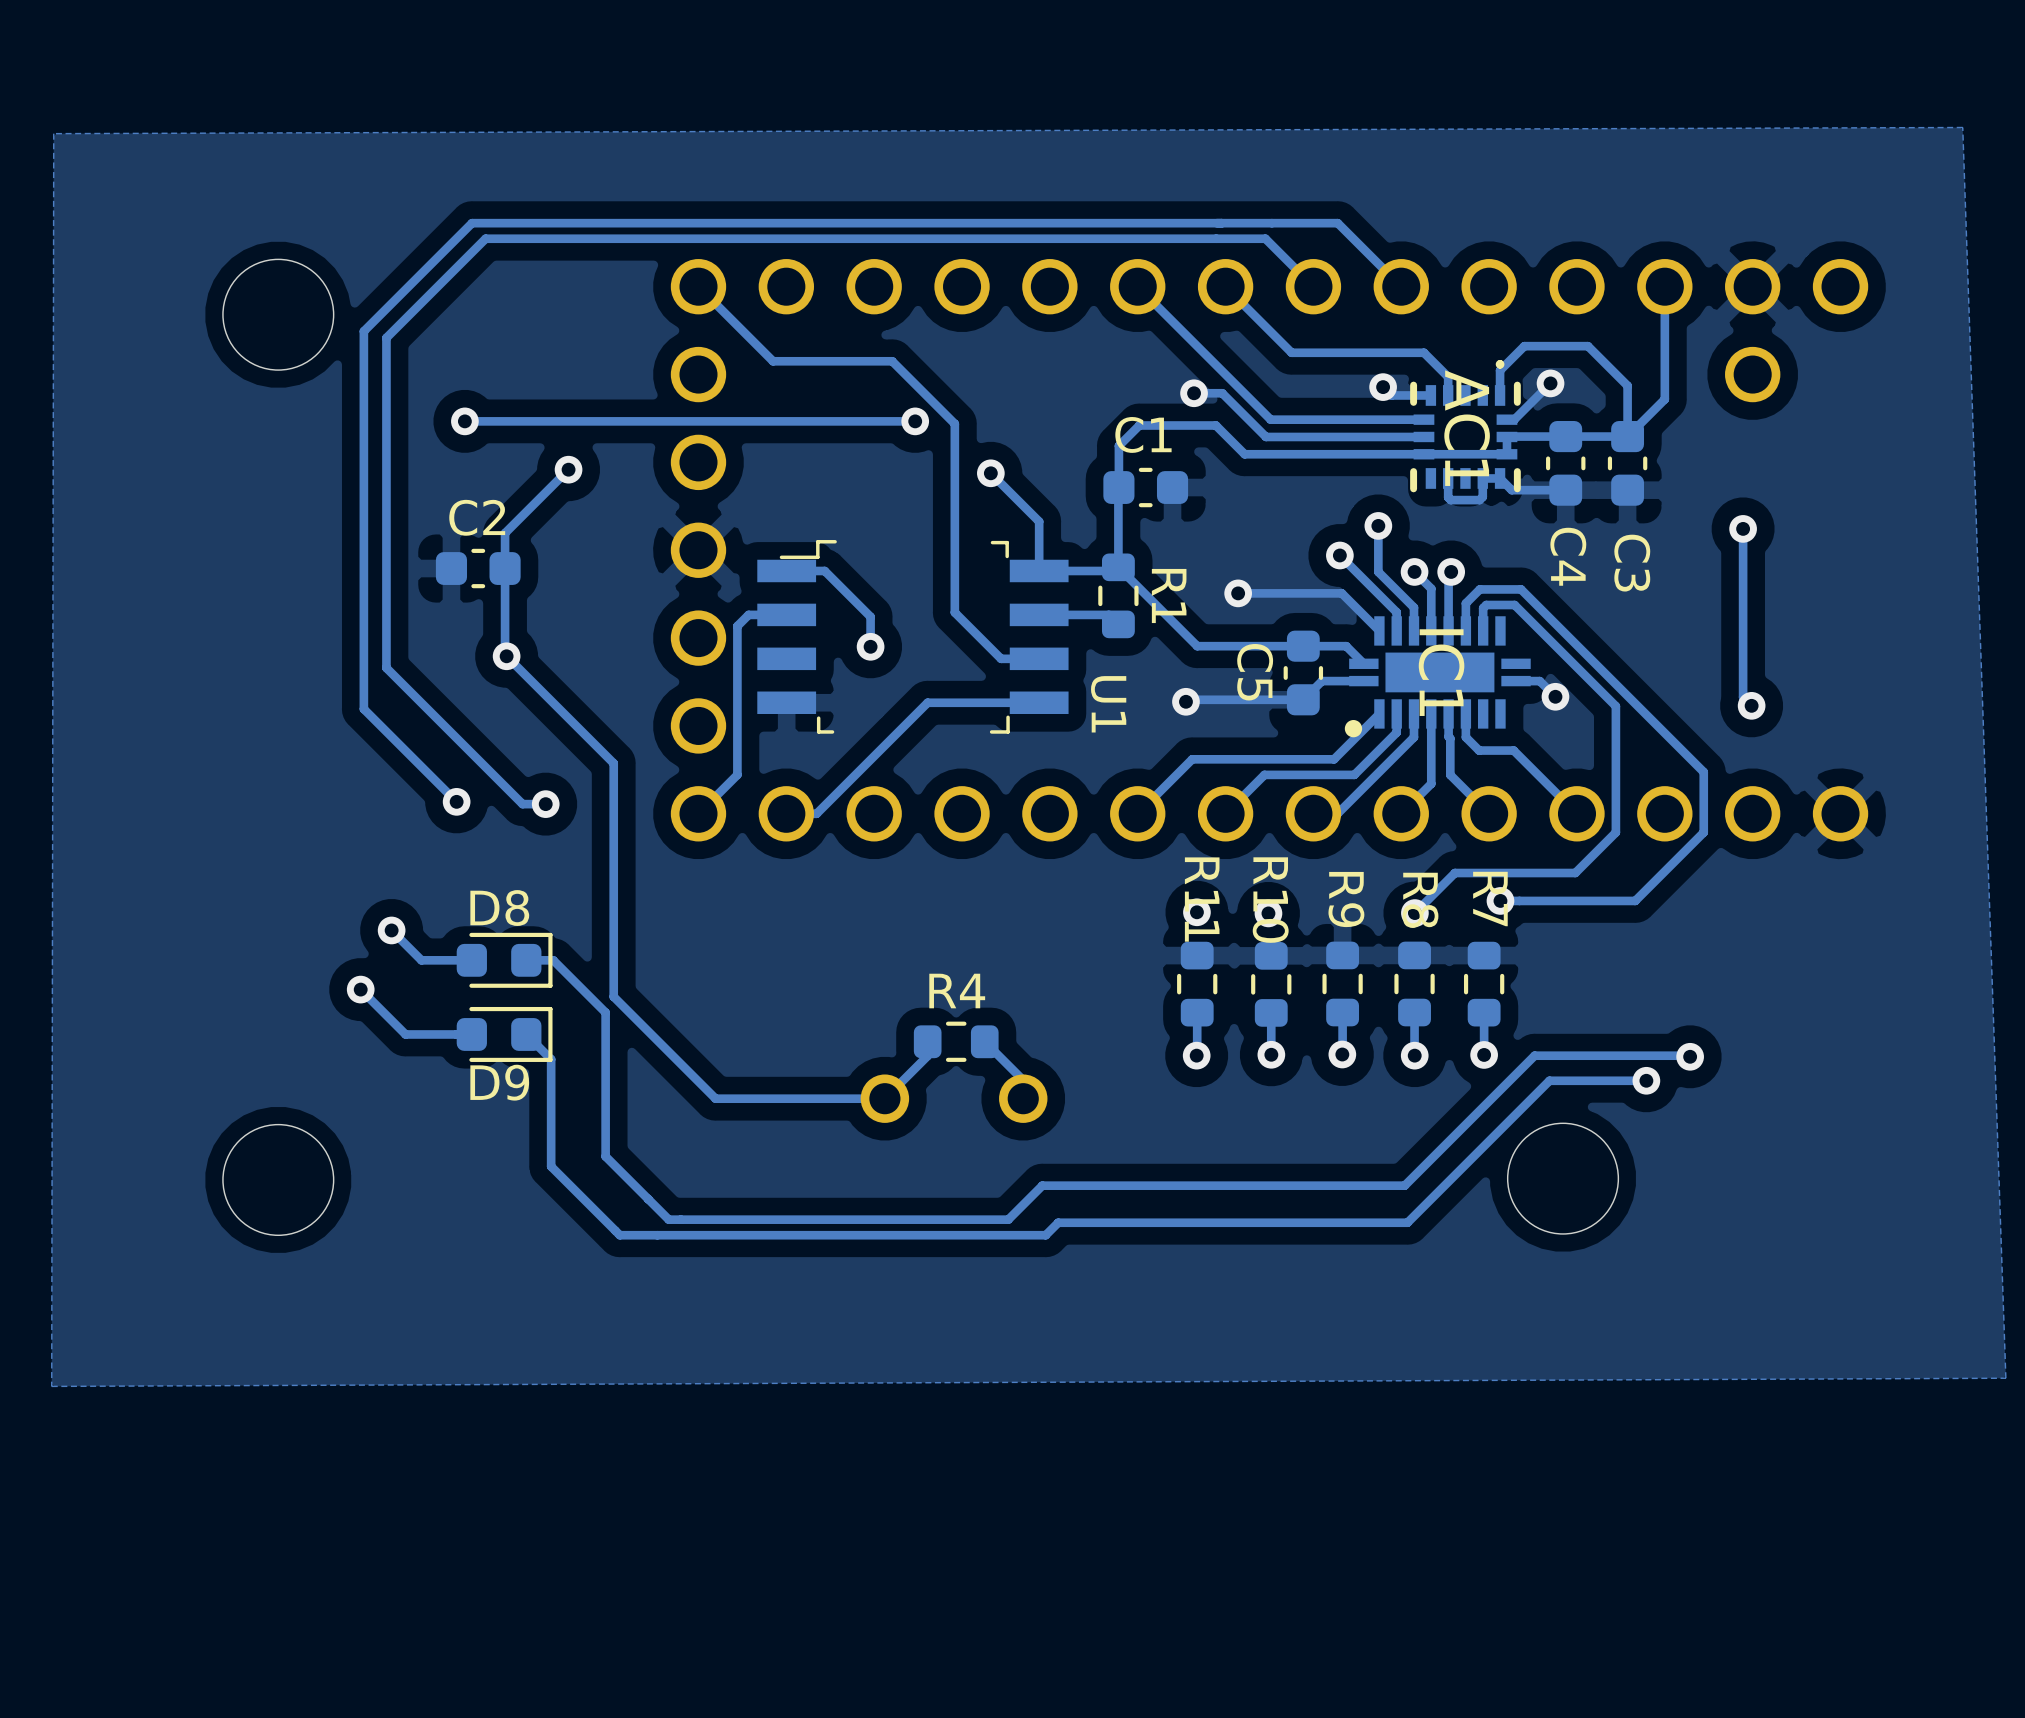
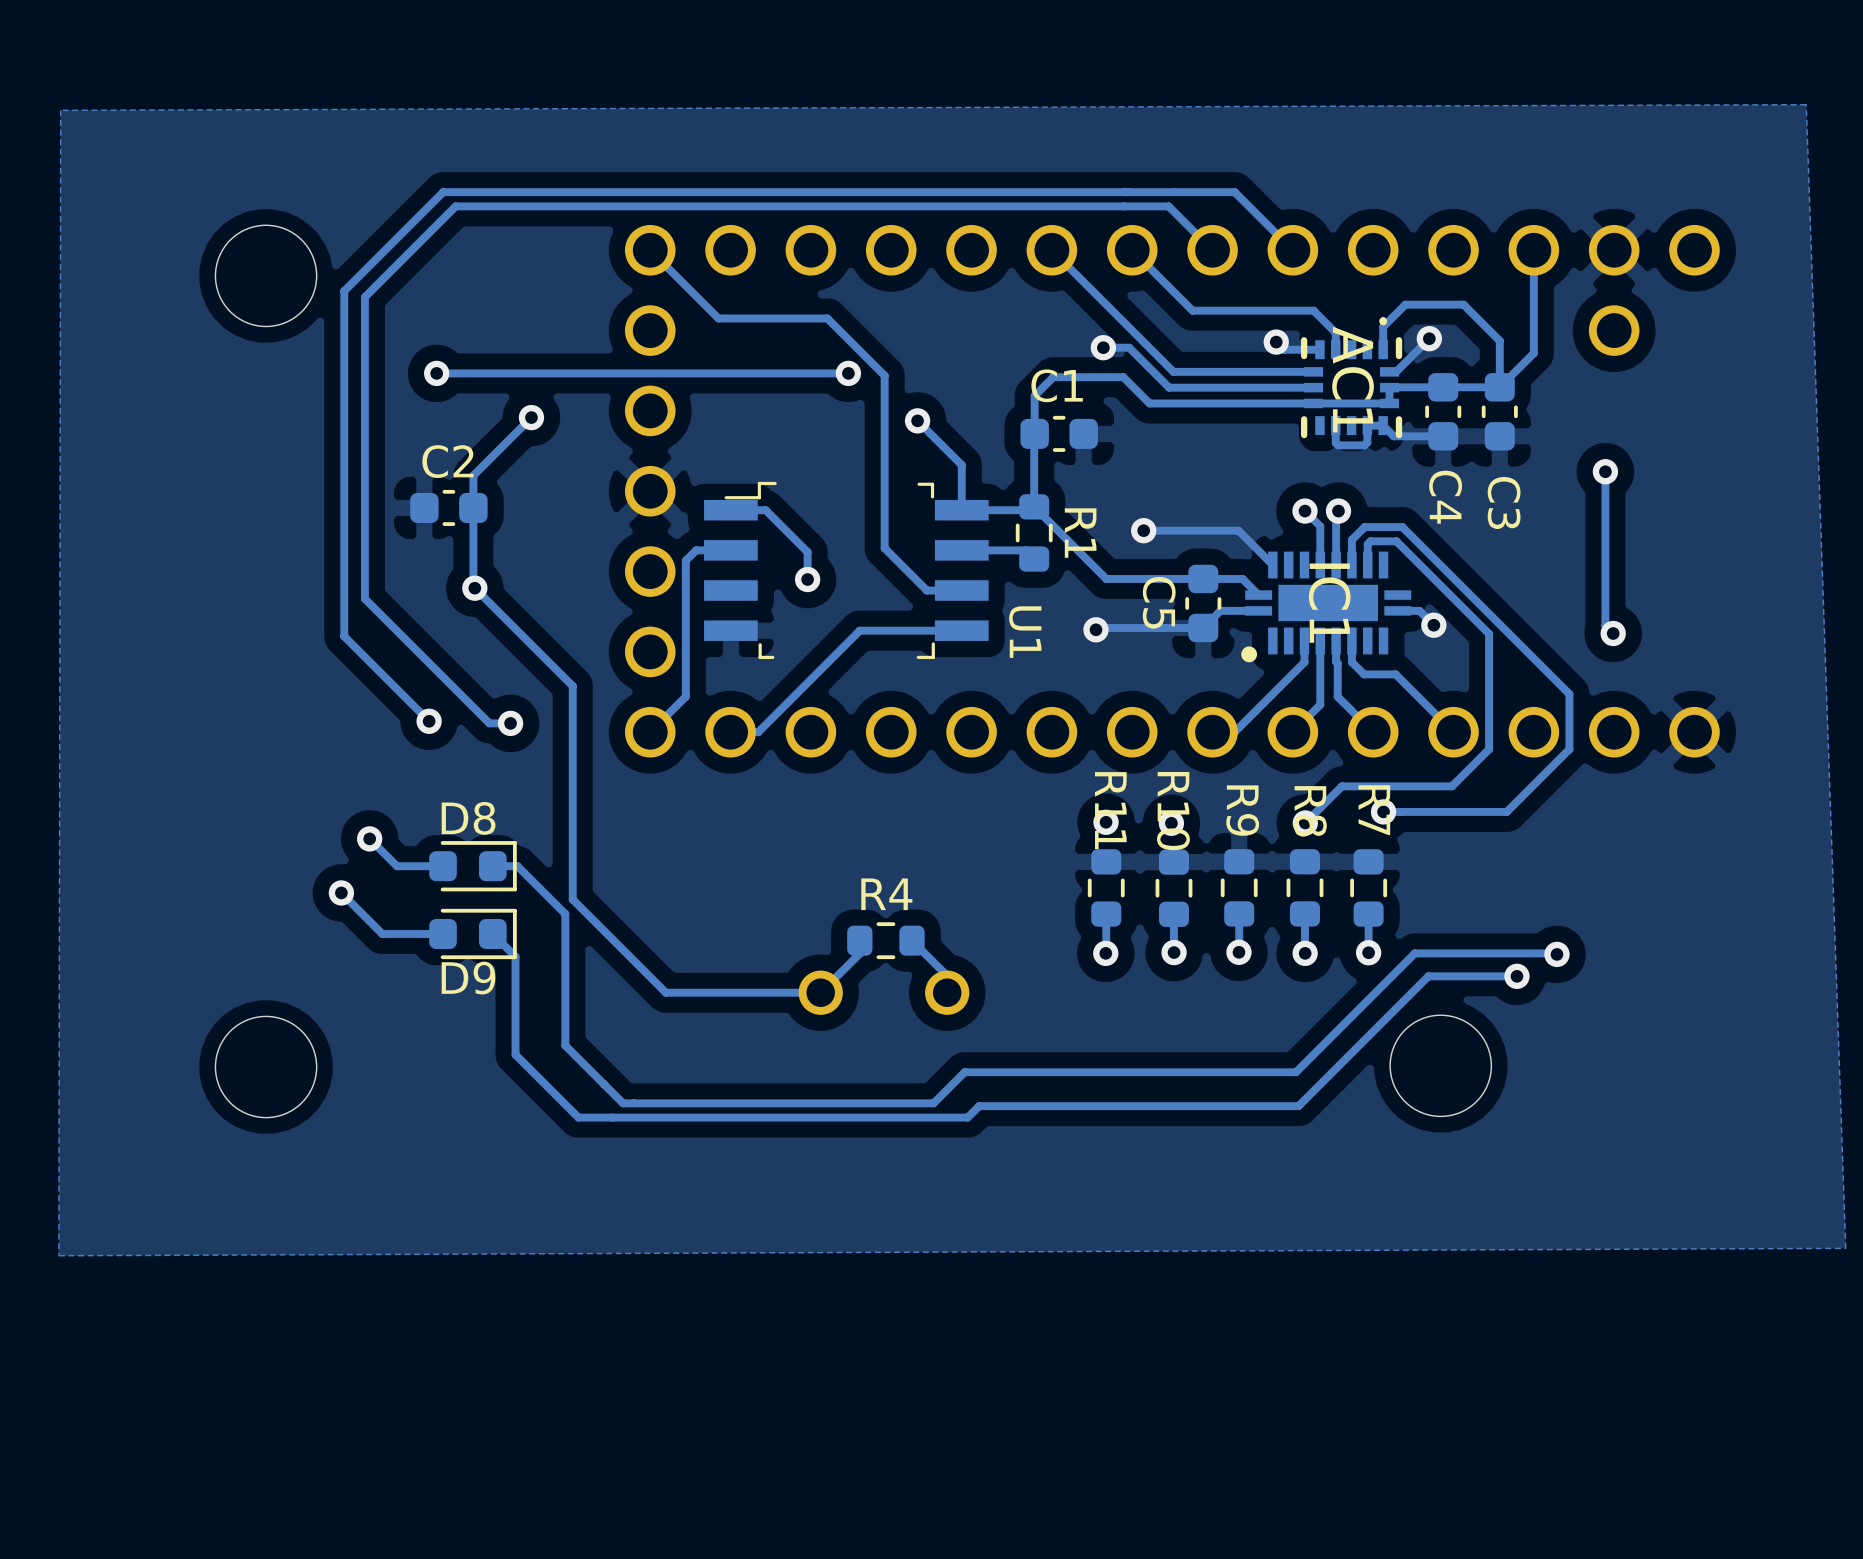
track: (1378, 525) (1378, 571) (1414, 607) (1414, 630) -> none
via: (1378, 525) -> none
track: (1339, 555) (1396, 612) (1396, 630) -> none
via: (1339, 555) -> none
track: (1379, 713) (1334, 759) (1192, 759) (1137, 813) -> none
track: (1396, 713) (1396, 732) (1354, 774) (1264, 774) (1225, 813) -> none

